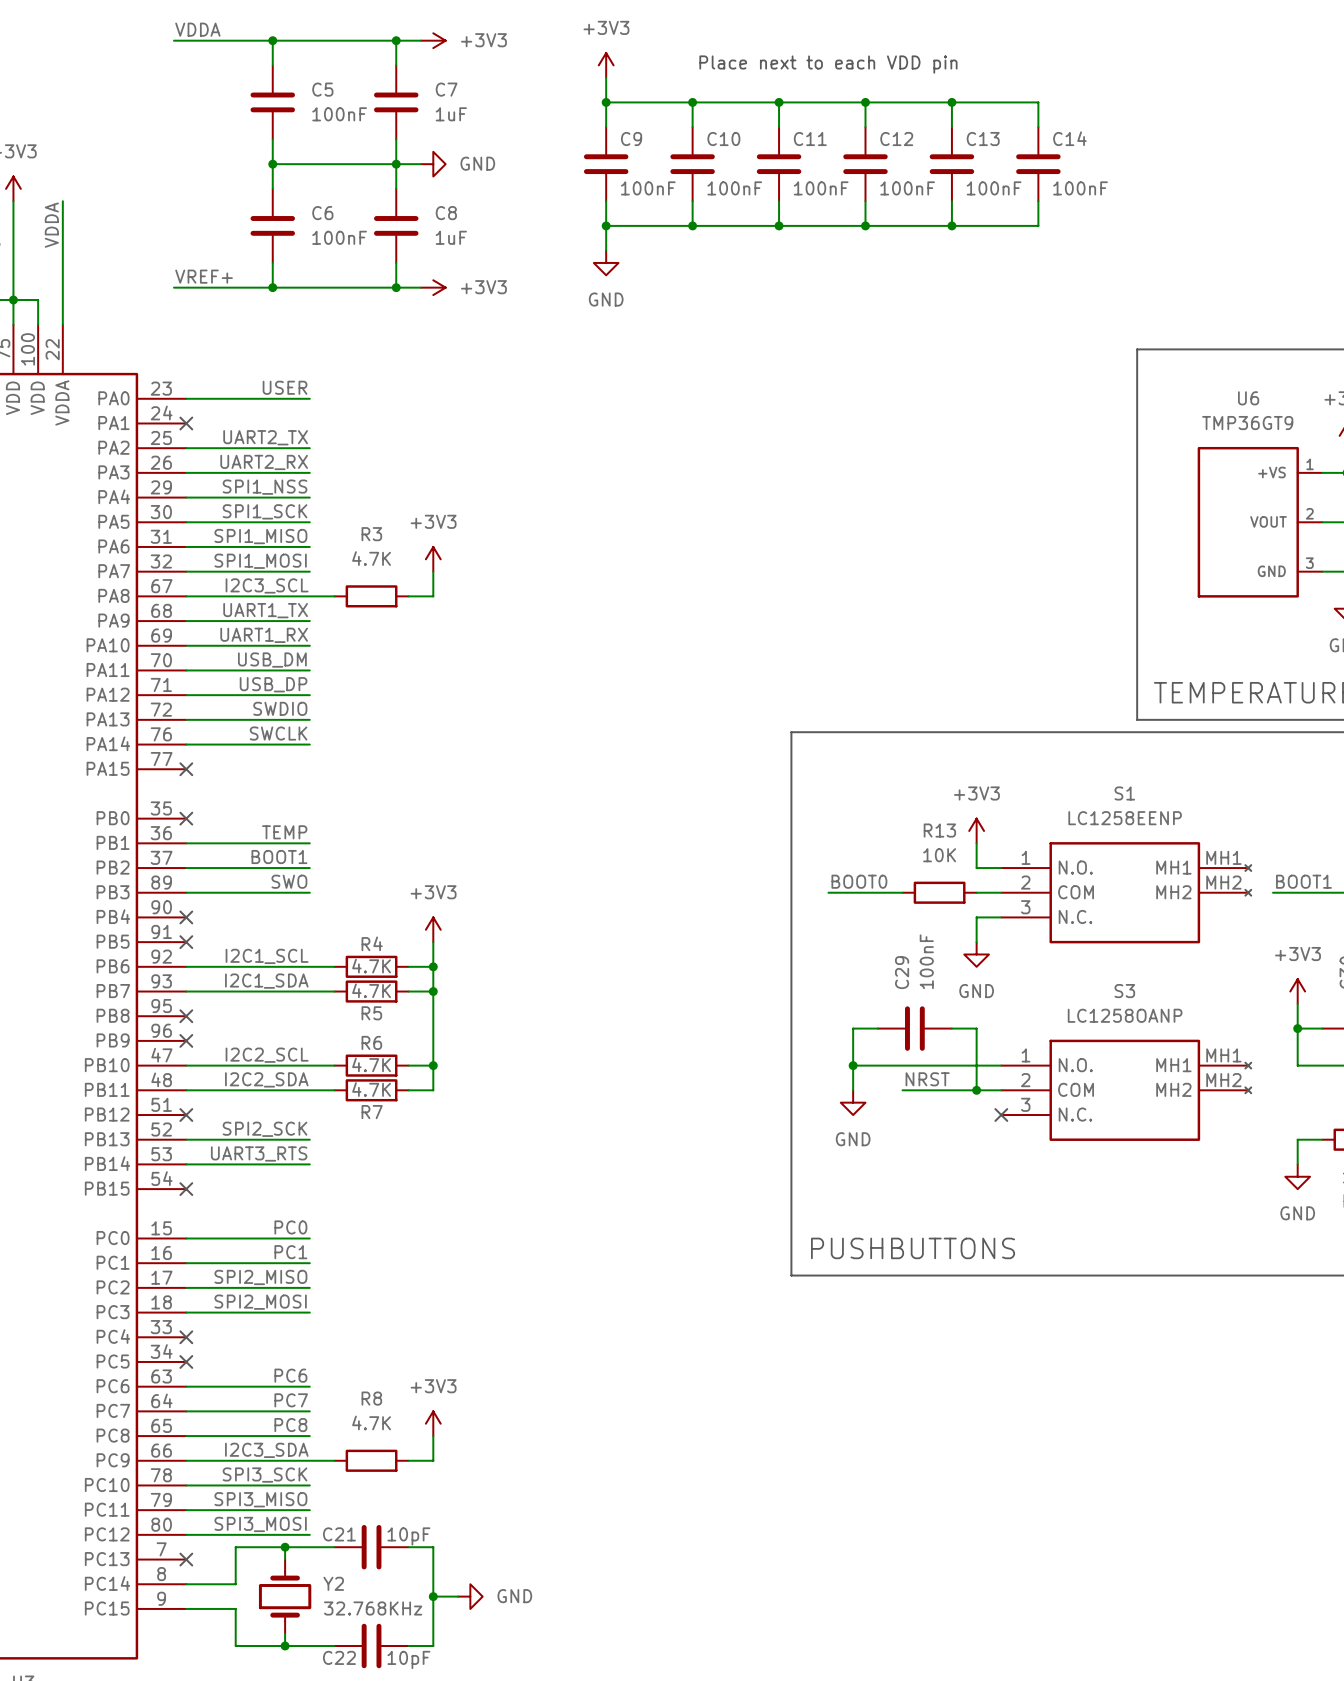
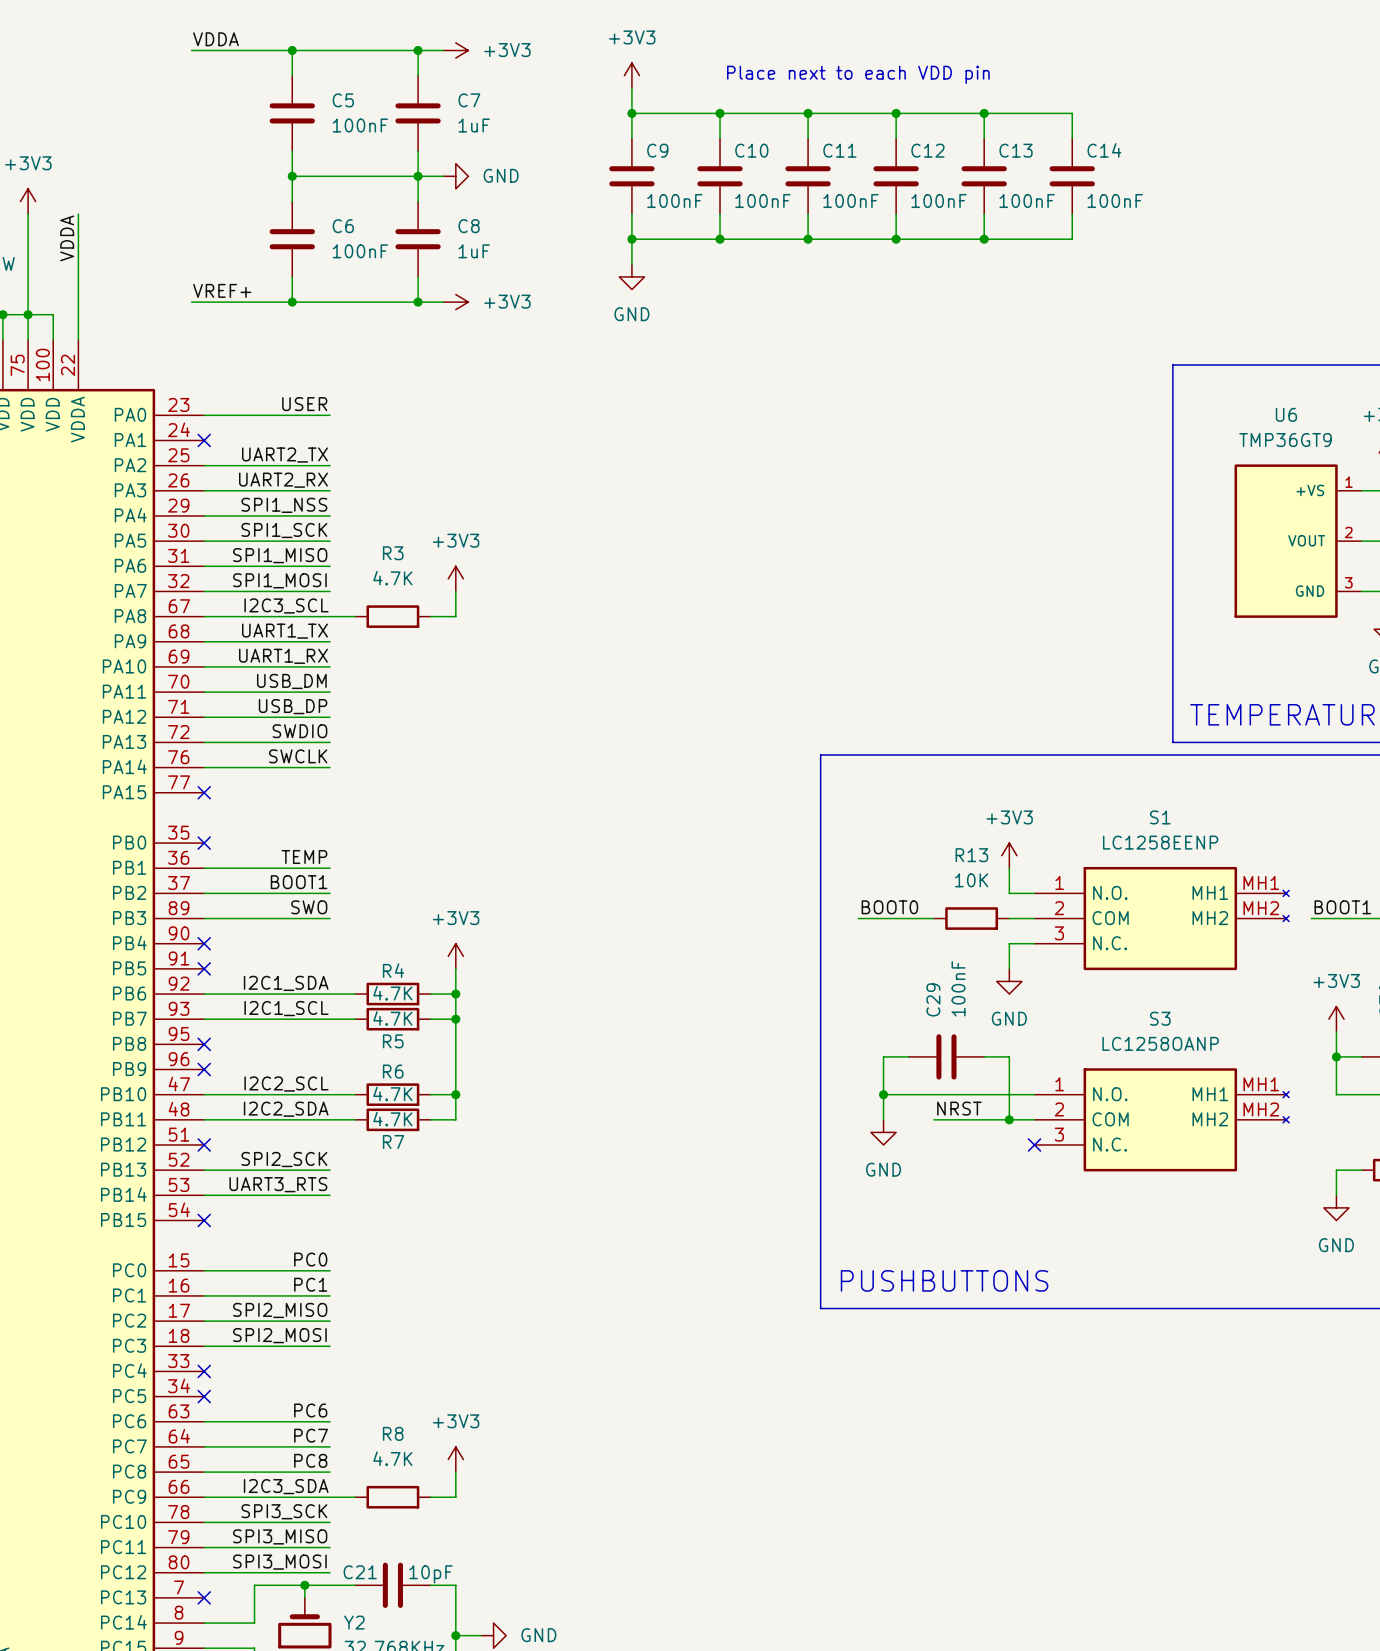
label: I2C1_SCL (267, 956) -> I2C1_SDA (286, 983)
label: I2C1_SDA (266, 981) -> I2C1_SCL (286, 1008)

